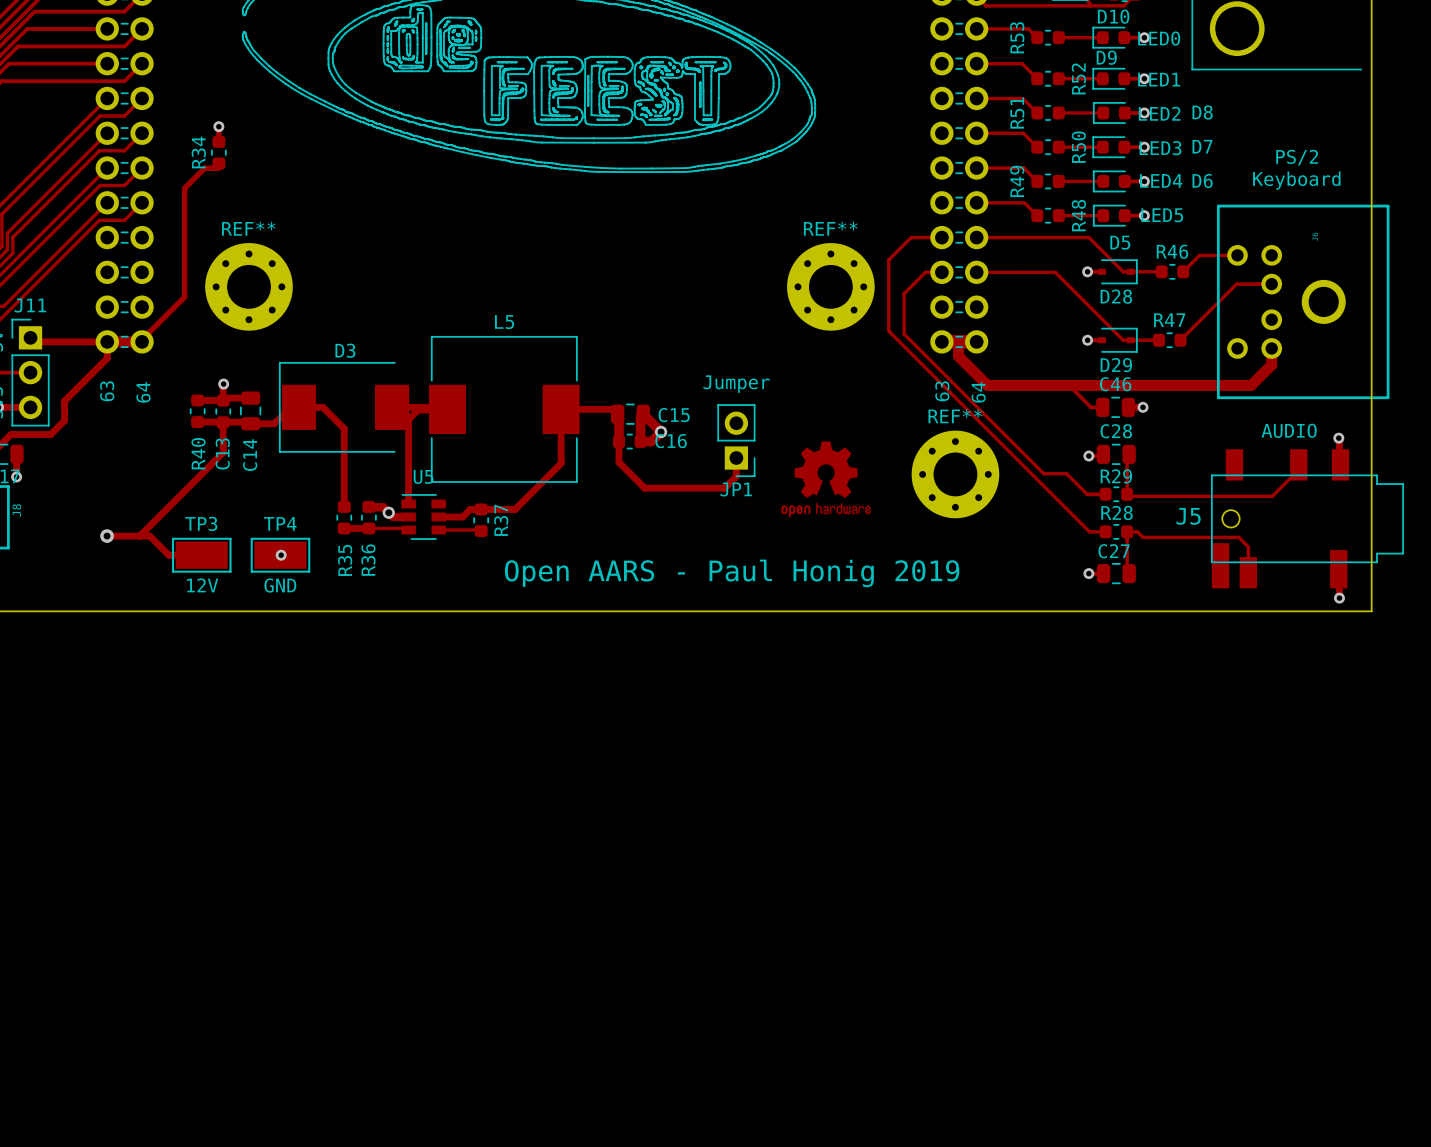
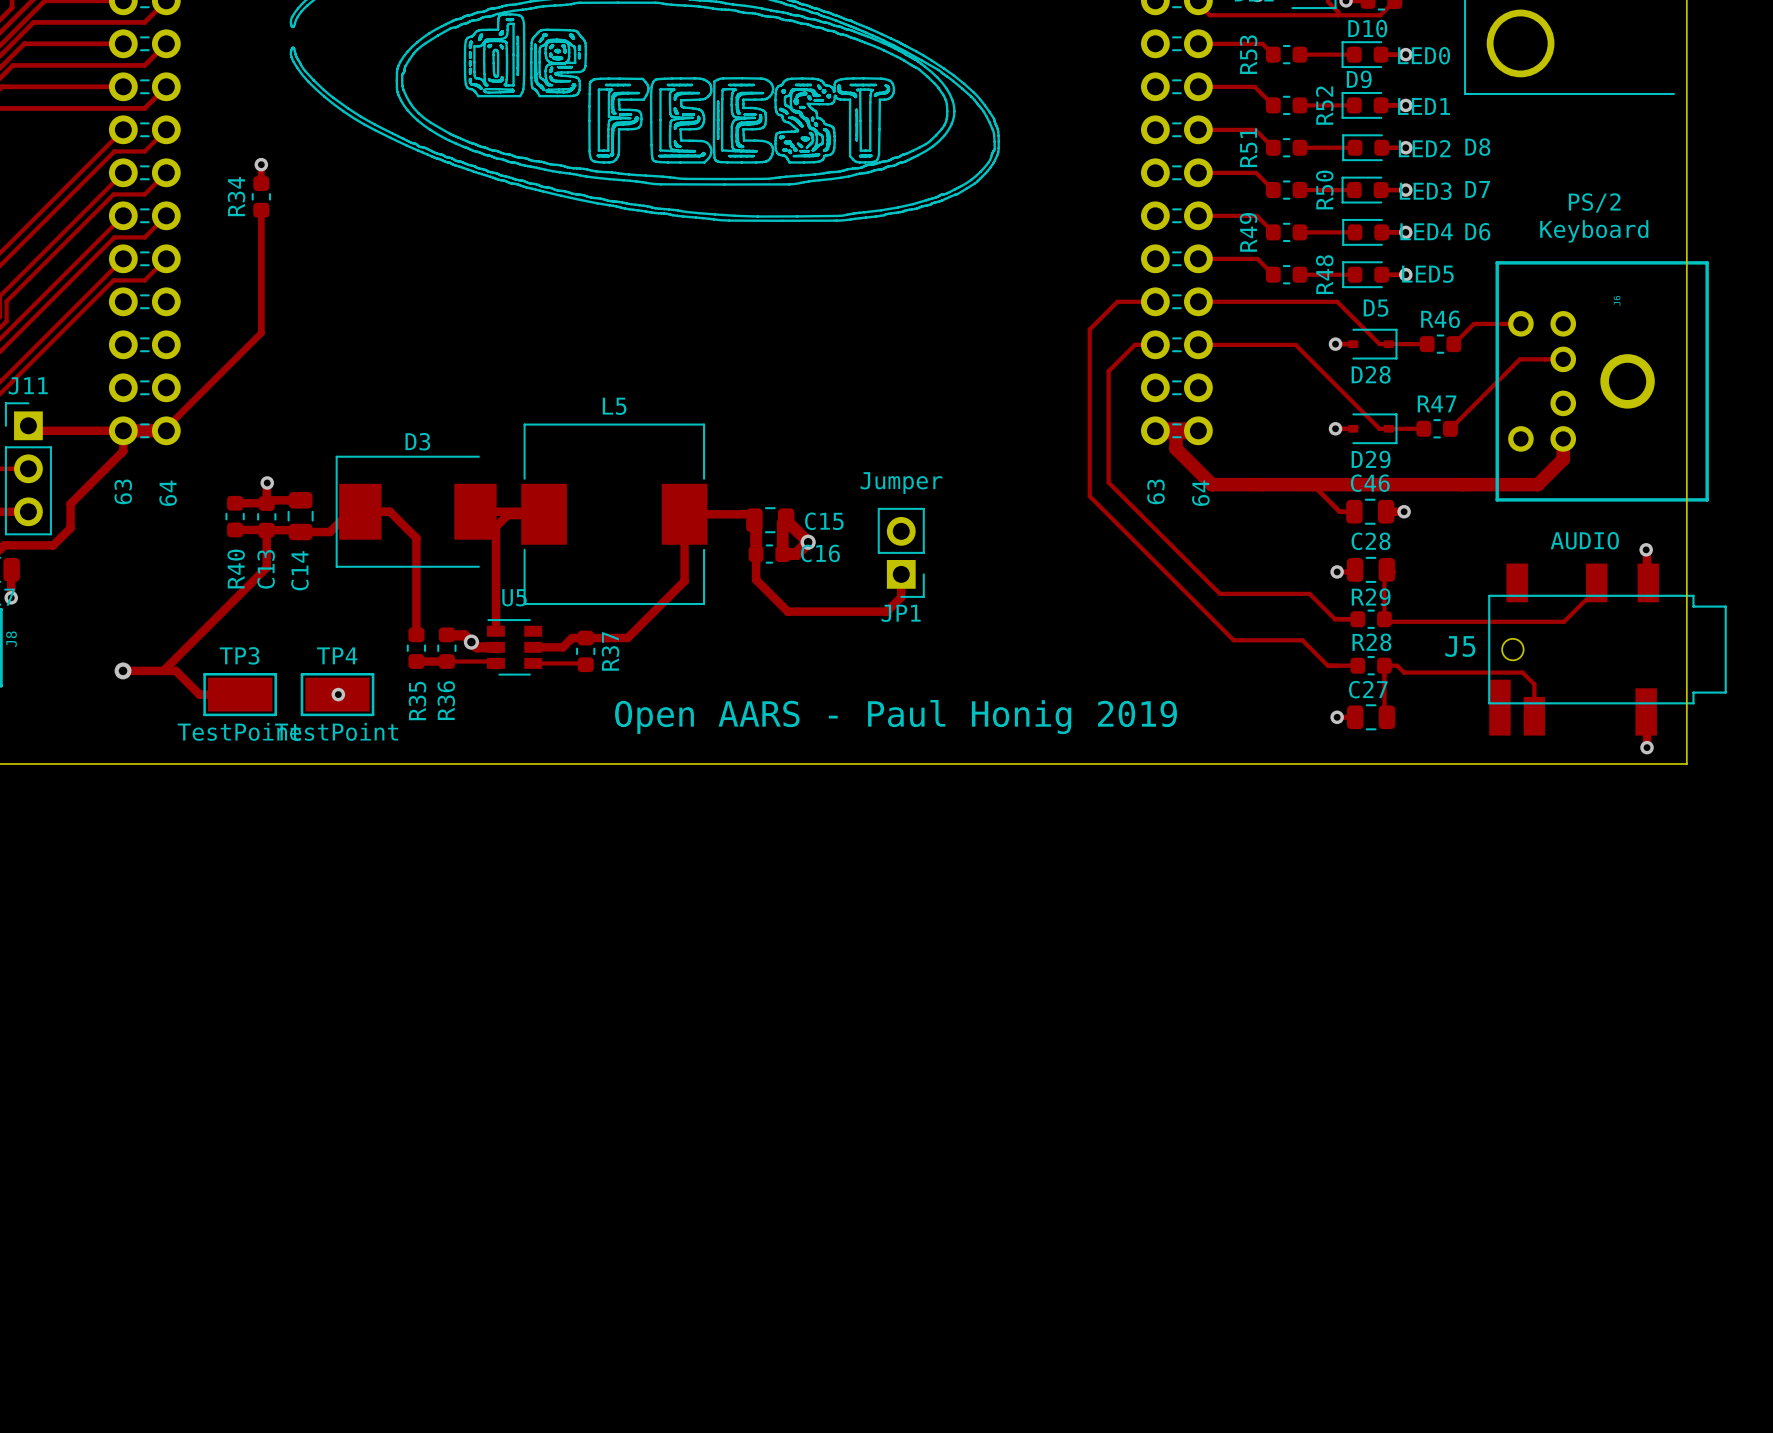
track: (218, 168) (204, 168) (184, 188) (184, 297) -> (261, 216) (261, 333) (219, 375)
REF**: (248, 286) -> none
REF**: (830, 286) -> none
track: (888, 331) (1089, 531) -> (1089, 417) (1089, 496) (1233, 640) (1302, 640) (1327, 665) (1337, 665)
track: (904, 334) (1043, 473) -> (1108, 421) (1108, 482) (1219, 593) (1281, 593)
drawing: [781, 441, 871, 518] -> none
REF**: (955, 474) -> none
TP3 value: 12V (202, 585) -> TestPoint (239, 731)
TP4 value: GND (280, 585) -> TestPoint (336, 731)

